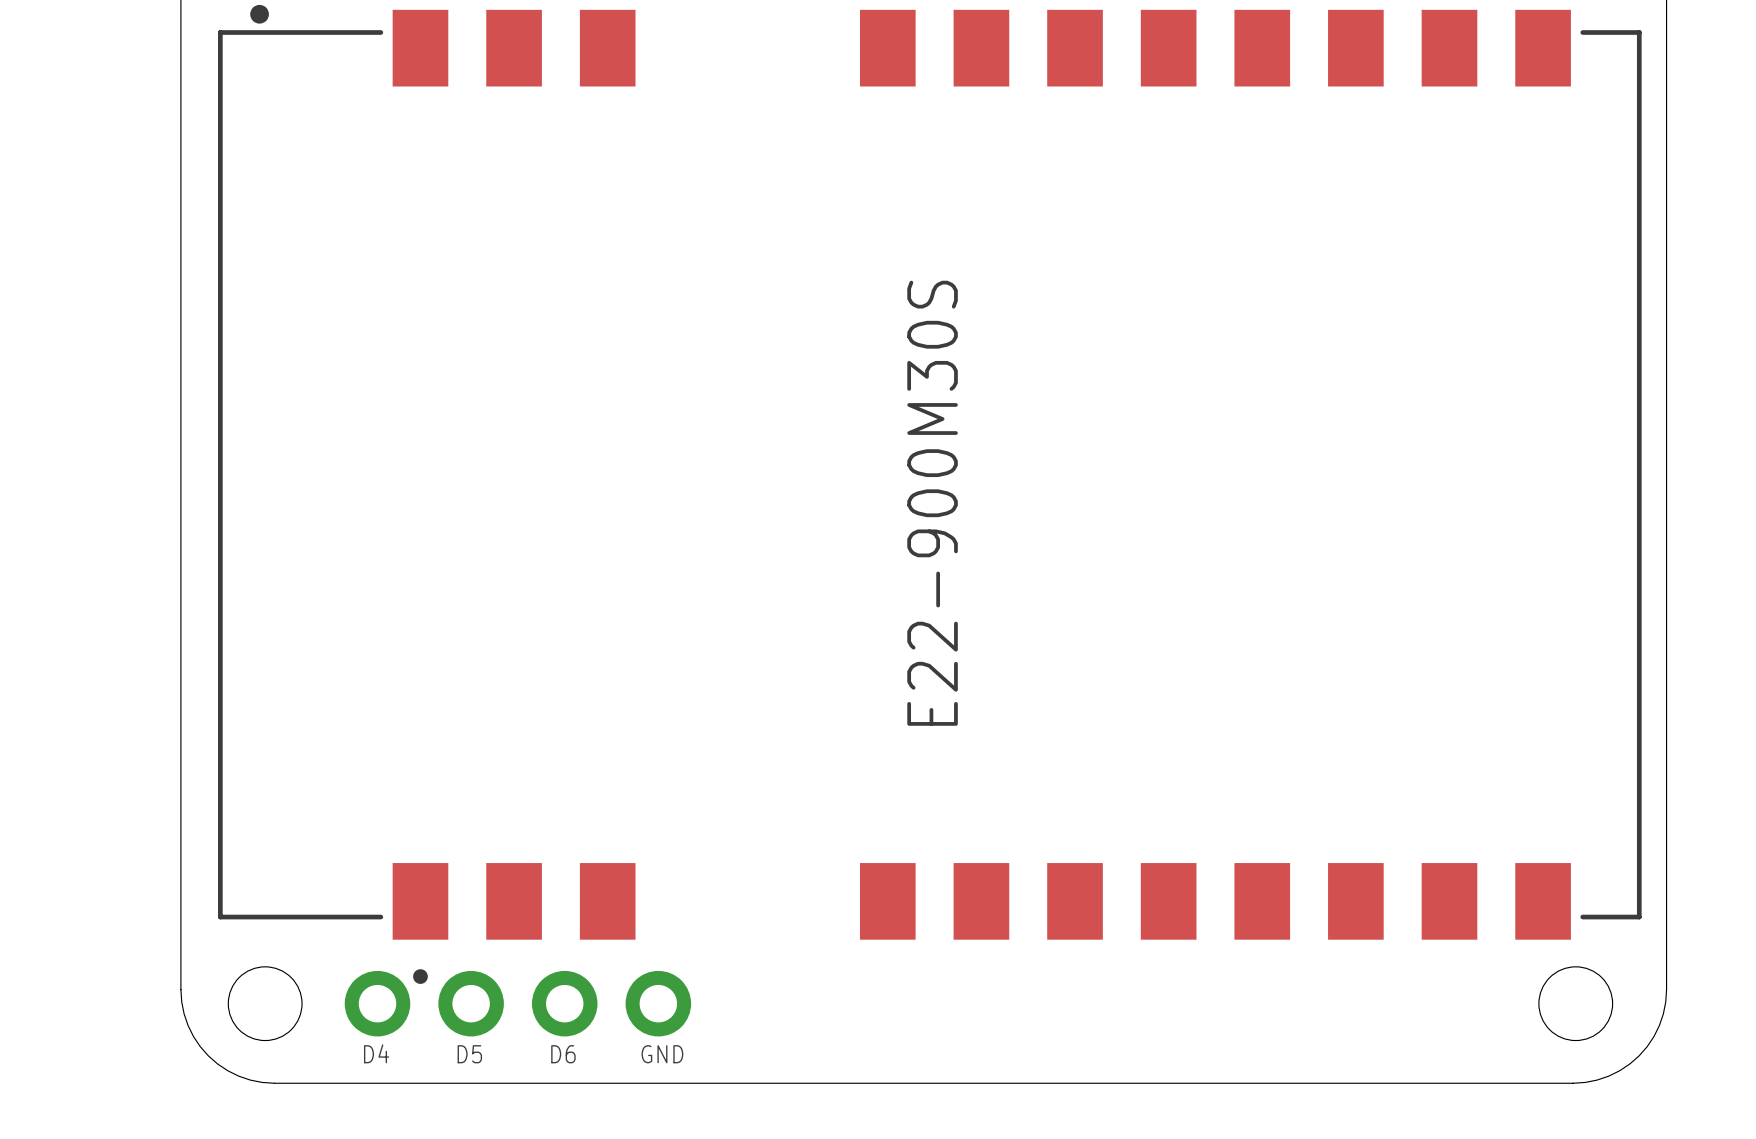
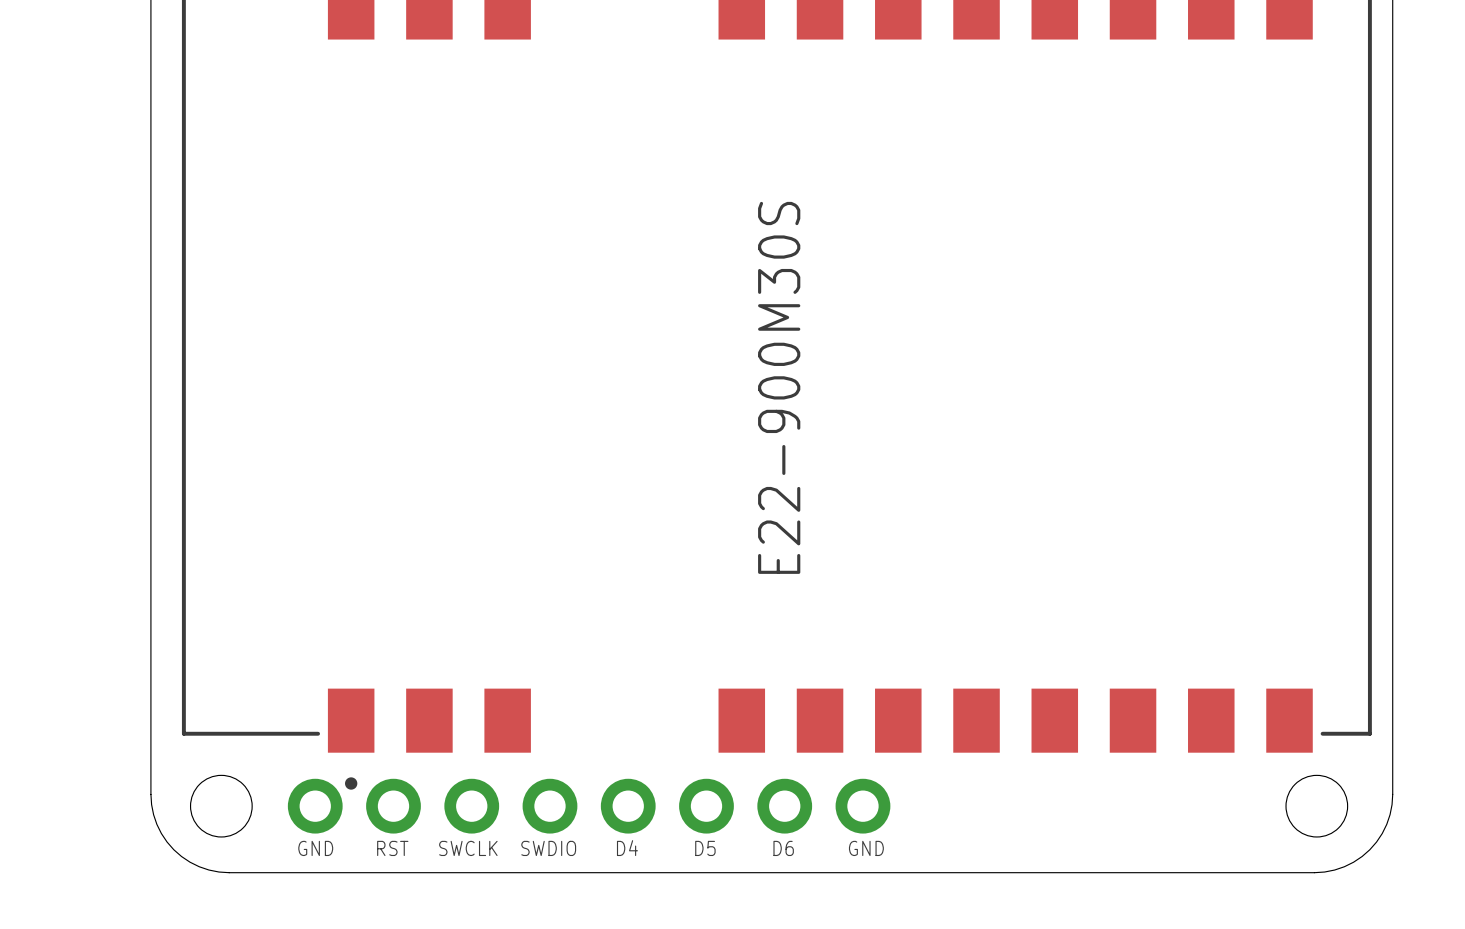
part: none -> (745, 806)
part text: D4 (376, 1053) -> SWDIO (548, 848)
part text: D5 (469, 1054) -> SWCLK (468, 848)
part text: D6 (563, 1054) -> RST (392, 848)
part text position: GND (662, 1054) -> GND (315, 848)

